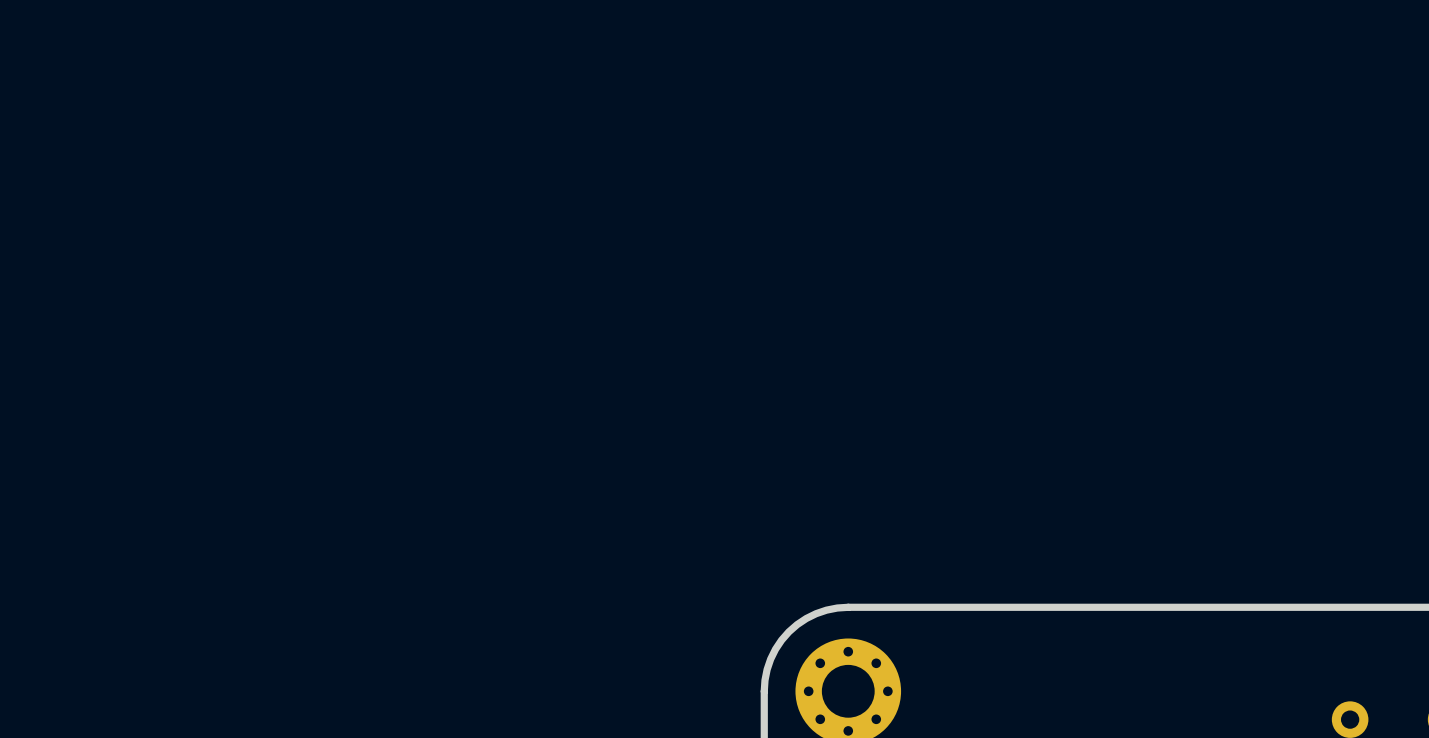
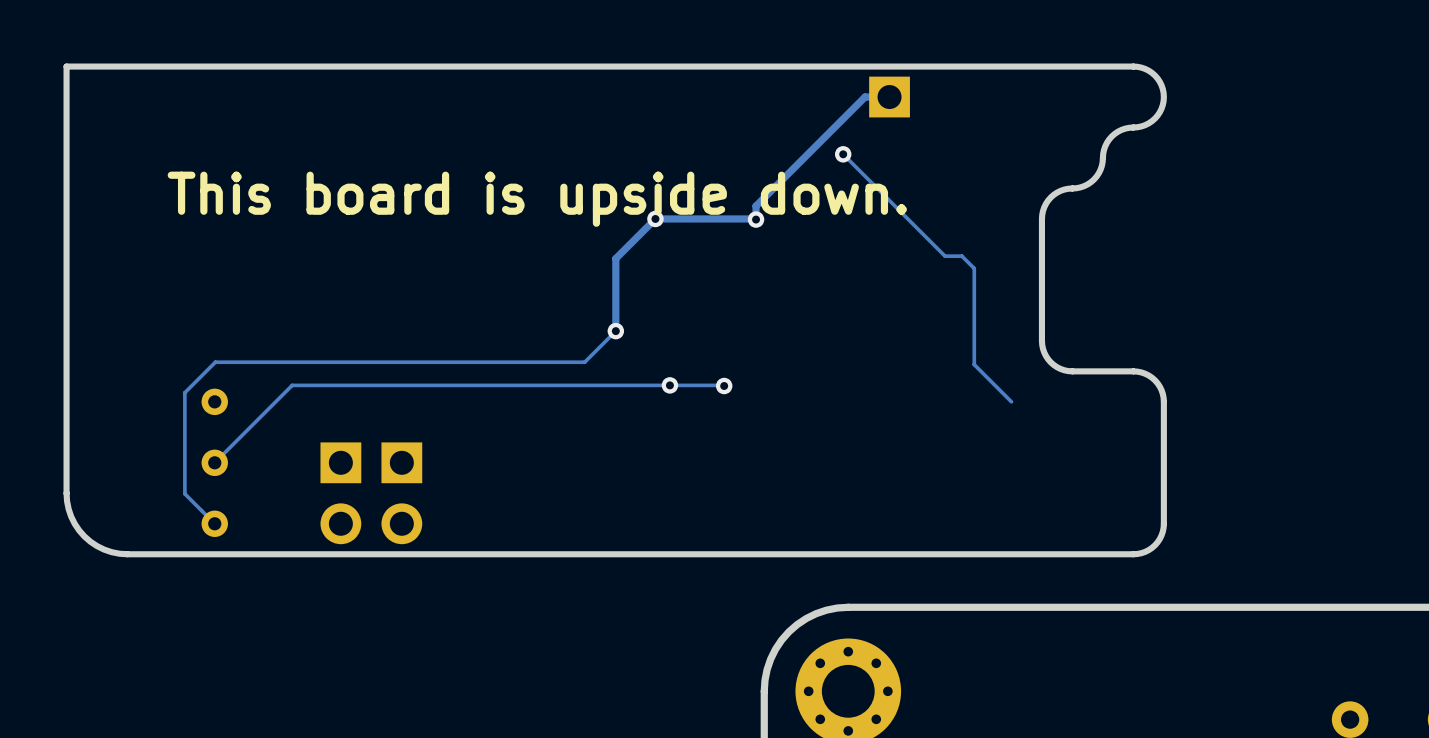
board edge: none -> (1133, 66) (66, 66) (66, 493) (71, 516) (79, 530) (97, 546) (111, 552) (127, 554) (1133, 554) (1145, 551) (1157, 542) (1163, 527) (1163, 401) (1161, 390) (1151, 377) (1141, 372) (1072, 371) (1060, 369) (1053, 365) (1046, 356) (1041, 340) (1041, 218) (1046, 203) (1050, 197) (1060, 190) (1080, 187) (1090, 182) (1100, 169) (1103, 150) (1111, 136) (1121, 129) (1148, 123) (1157, 115) (1162, 104) (1162, 89) (1157, 78) (1148, 70) (1133, 66)
track: none -> (889, 97) (865, 97) (756, 206) (756, 219) (655, 218) (615, 258) (615, 331) (584, 362) (215, 362) (184, 392) (184, 493) (214, 523)
part: none -> (889, 97)
track: none -> (843, 154) (945, 256) (961, 256) (974, 268) (974, 364) (1011, 401)
via: none -> (843, 154)
text: none -> This board is upside down. (537, 199)
via: none -> (655, 218)
via: none -> (756, 219)
via: none -> (615, 331)
via: none -> (669, 385)
track: none -> (723, 385) (292, 385) (214, 462)
via: none -> (724, 386)
part: none -> (214, 462)
part: none -> (340, 493)
part: none -> (401, 493)

